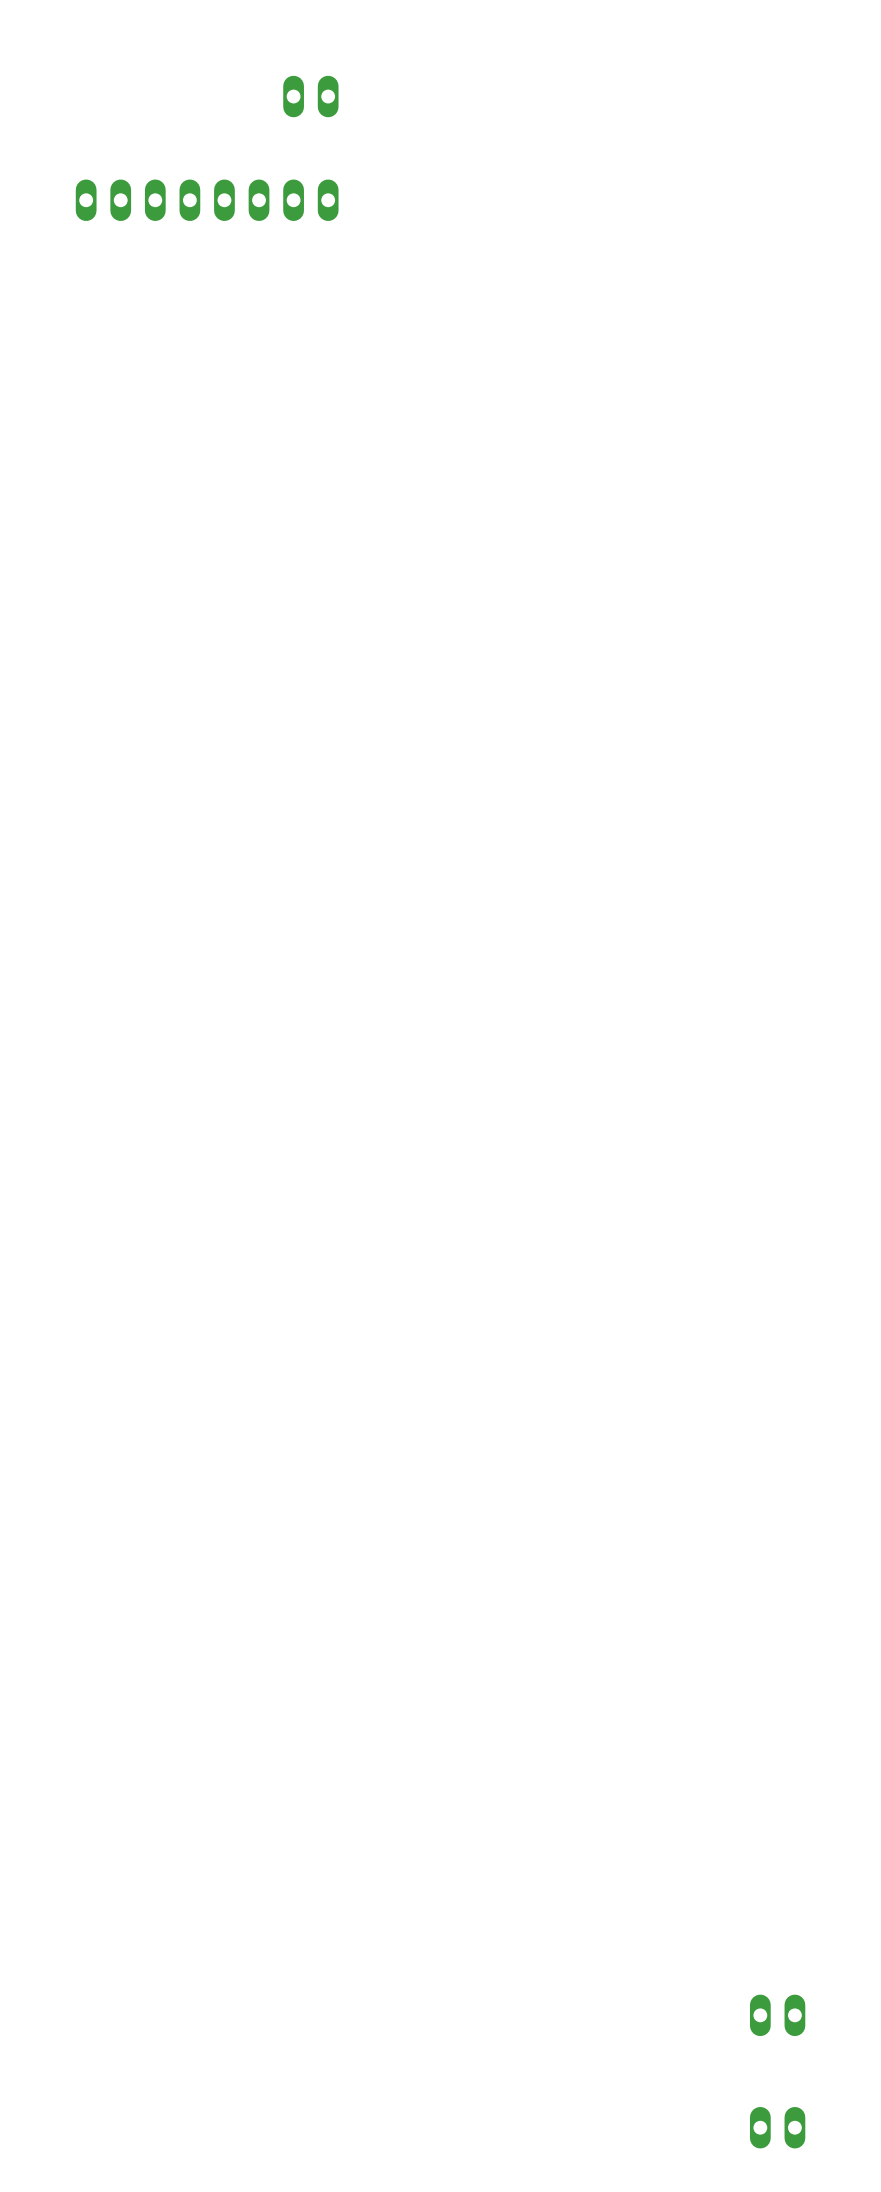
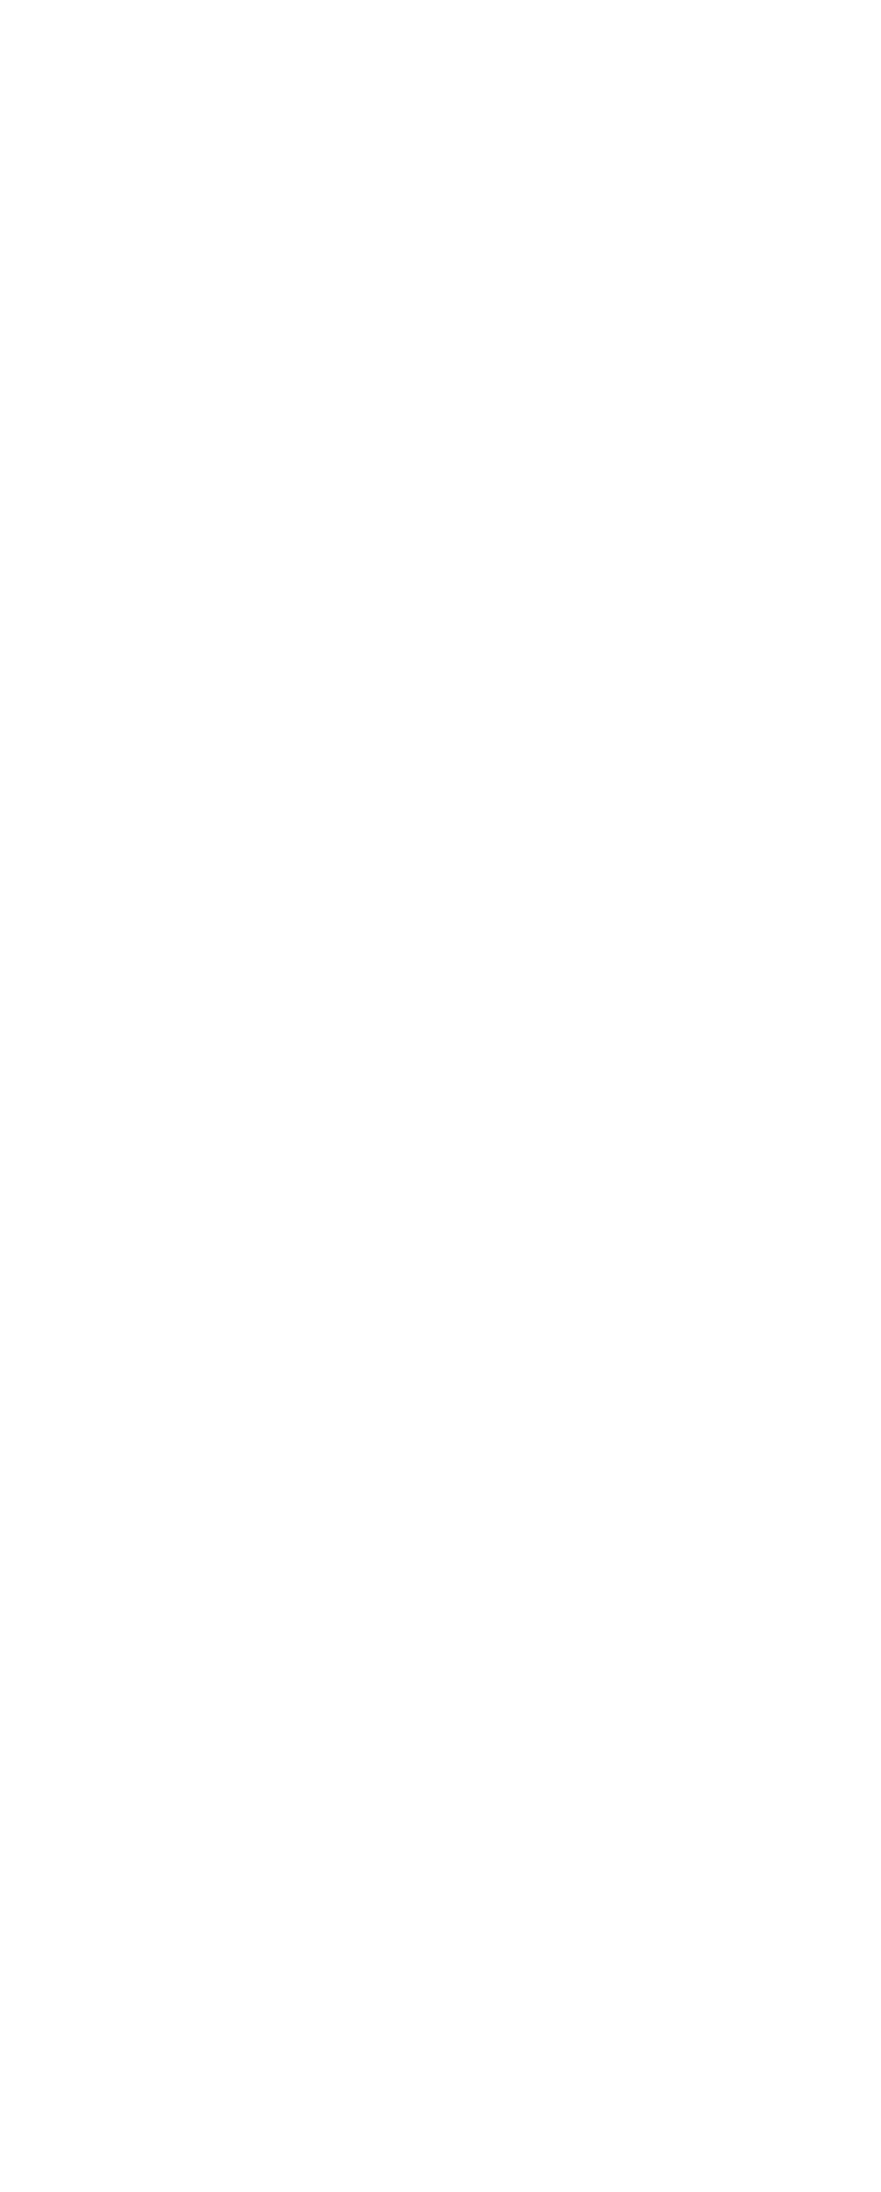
part: (310, 96) -> none
part: (207, 200) -> none
part: (777, 2015) -> none
part: (777, 2127) -> none

